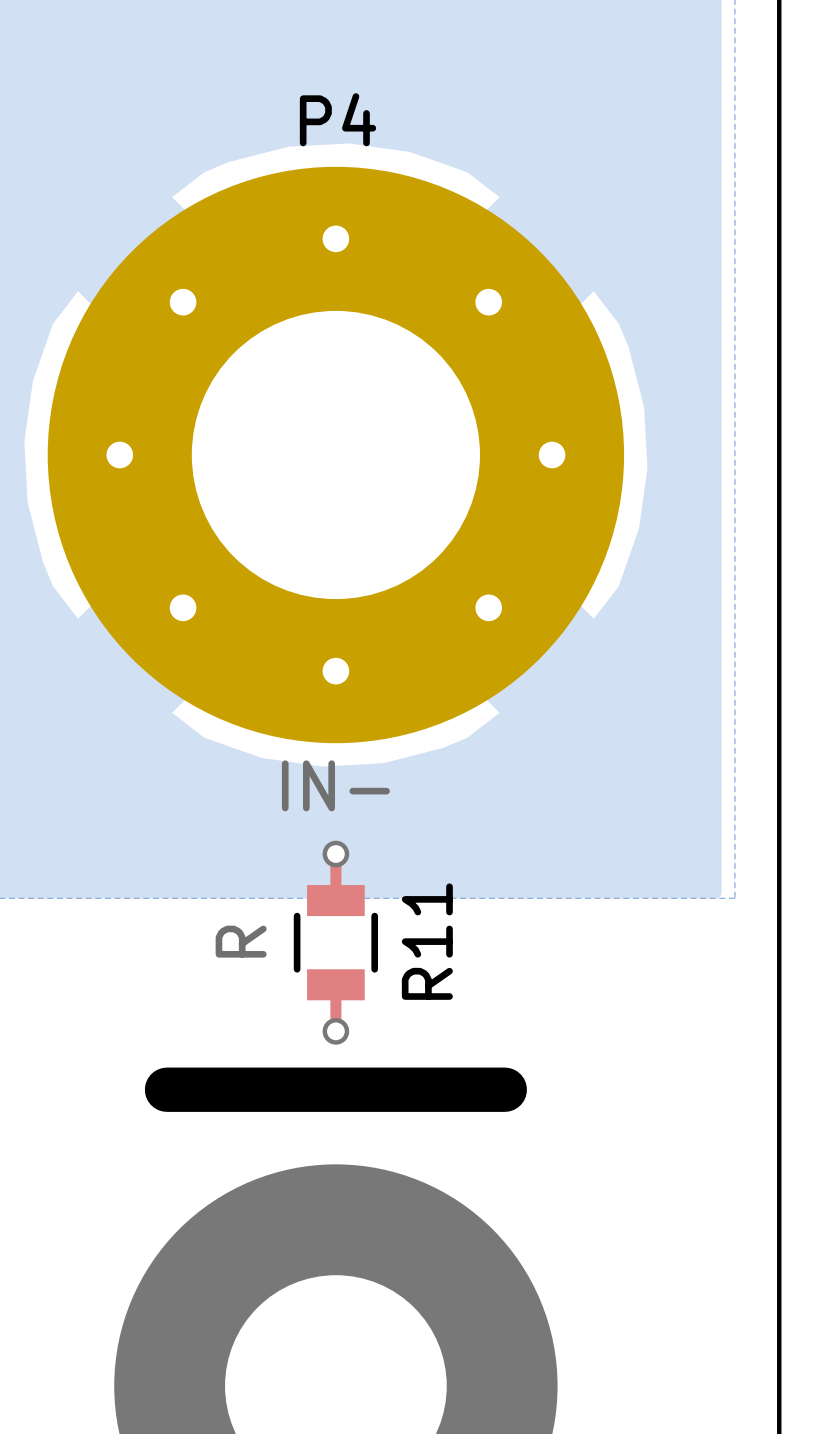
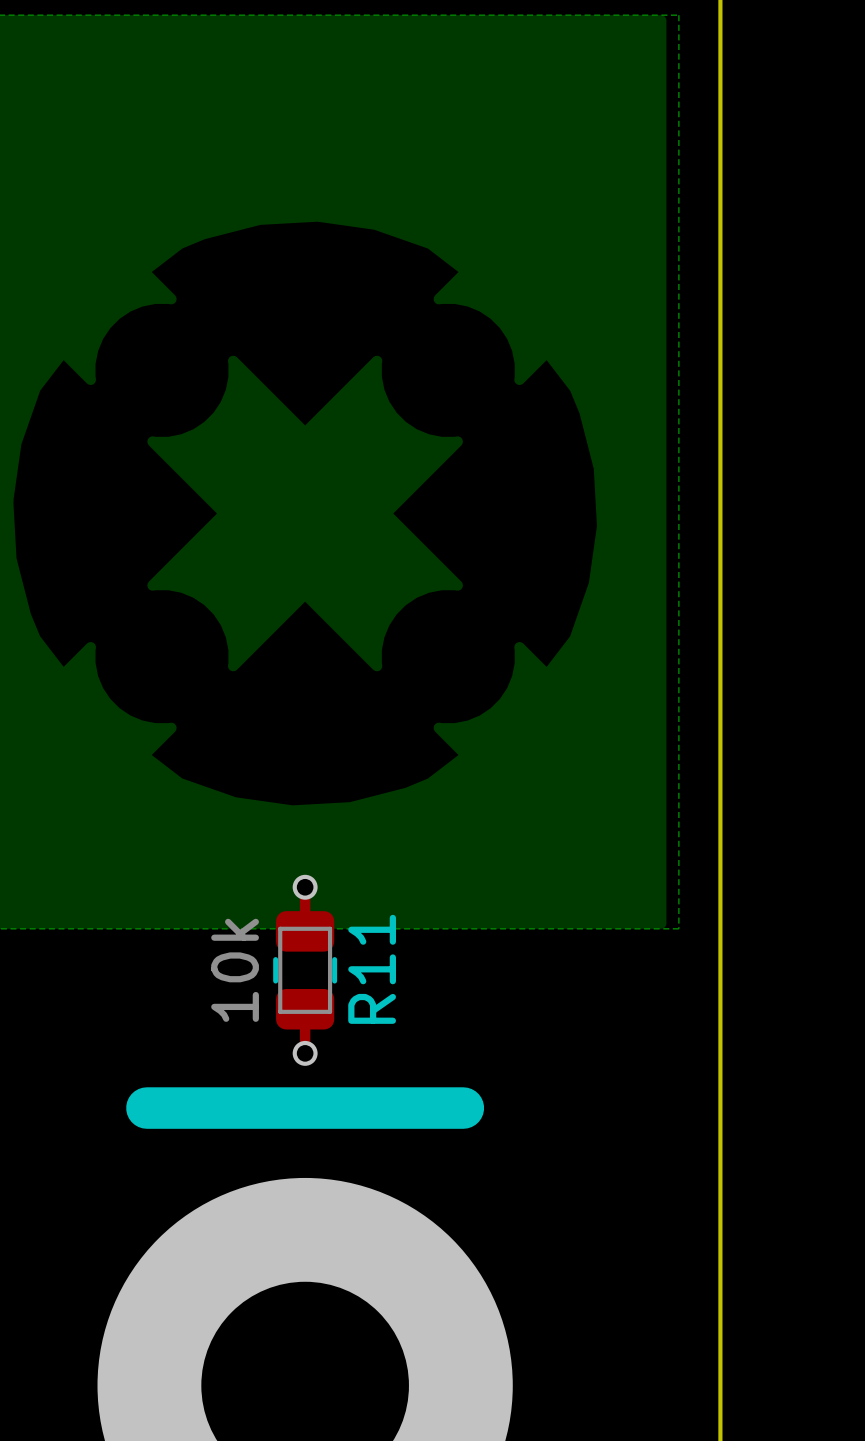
P4: IN- (335, 454) -> none
R11 footprint: [293, 885, 379, 1001] -> [273, 911, 338, 1030]
R11 value: R (241, 941) -> 10k (235, 970)

